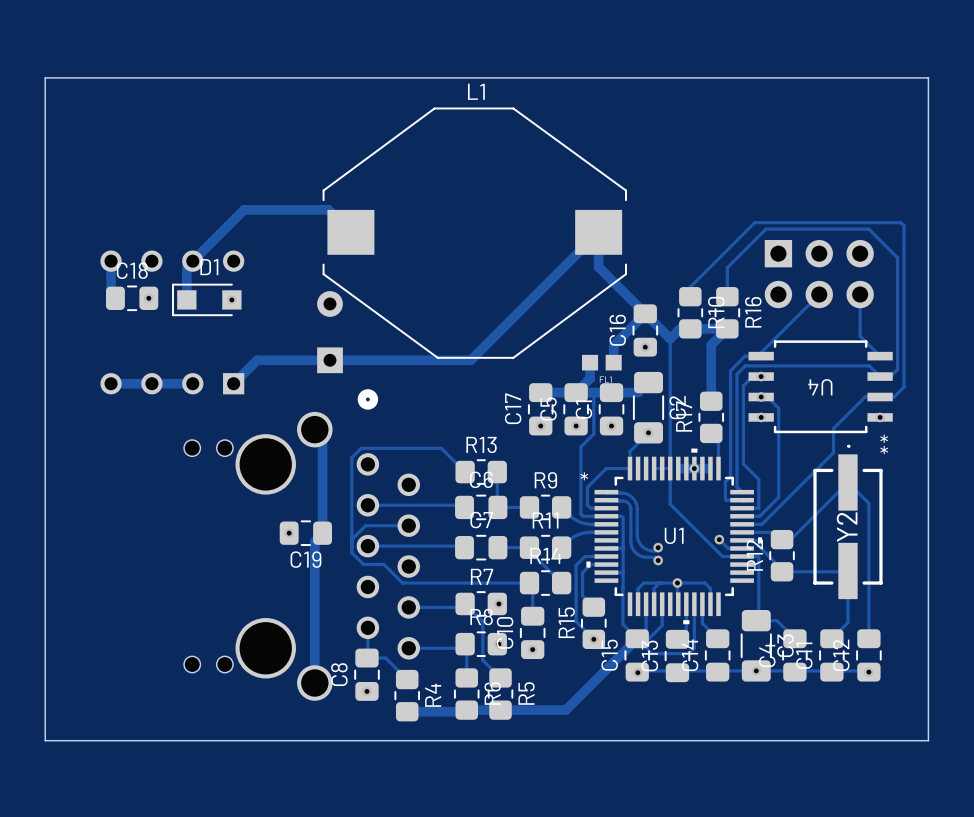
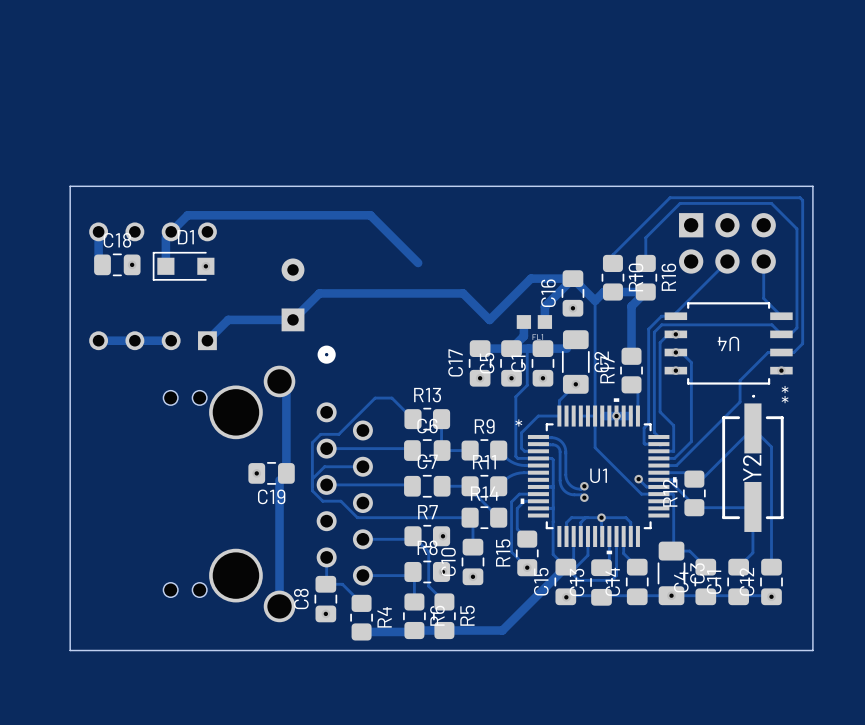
board edge: (45, 77) (928, 77) (928, 740) (45, 740) (45, 77) -> (70, 186) (70, 650) (812, 650) (812, 186) (70, 186)
track: (350, 232) (328, 209) (244, 209) (211, 242) -> (418, 263) (370, 215) (187, 215)
L1: (474, 233) -> none
track: (645, 313) (598, 267) (598, 232) (470, 360) (330, 360) -> (572, 278) (531, 278) (489, 319) (463, 293) (319, 293) (293, 319)
track: (422, 448) (361, 448) (351, 457) (351, 498) -> (375, 398) (338, 434) (320, 434) (312, 442)

